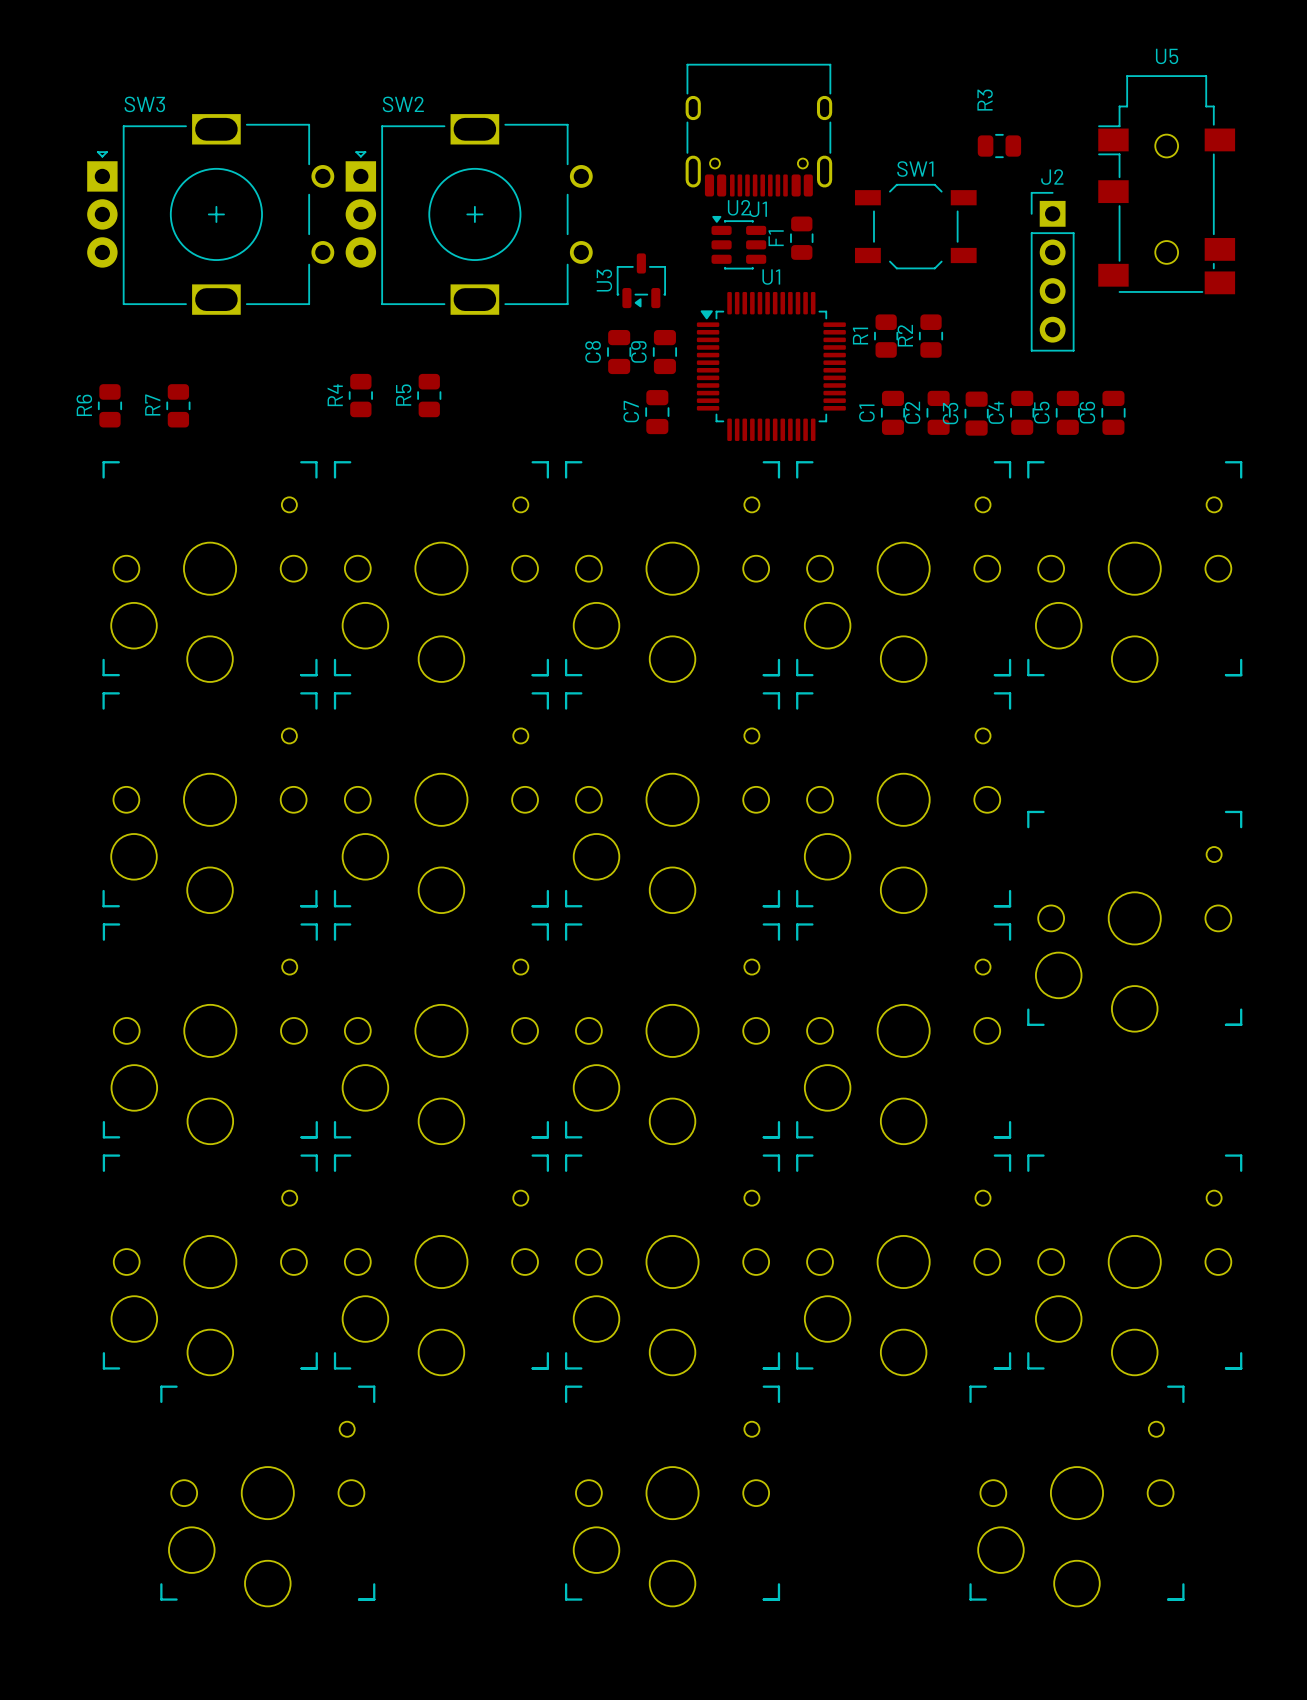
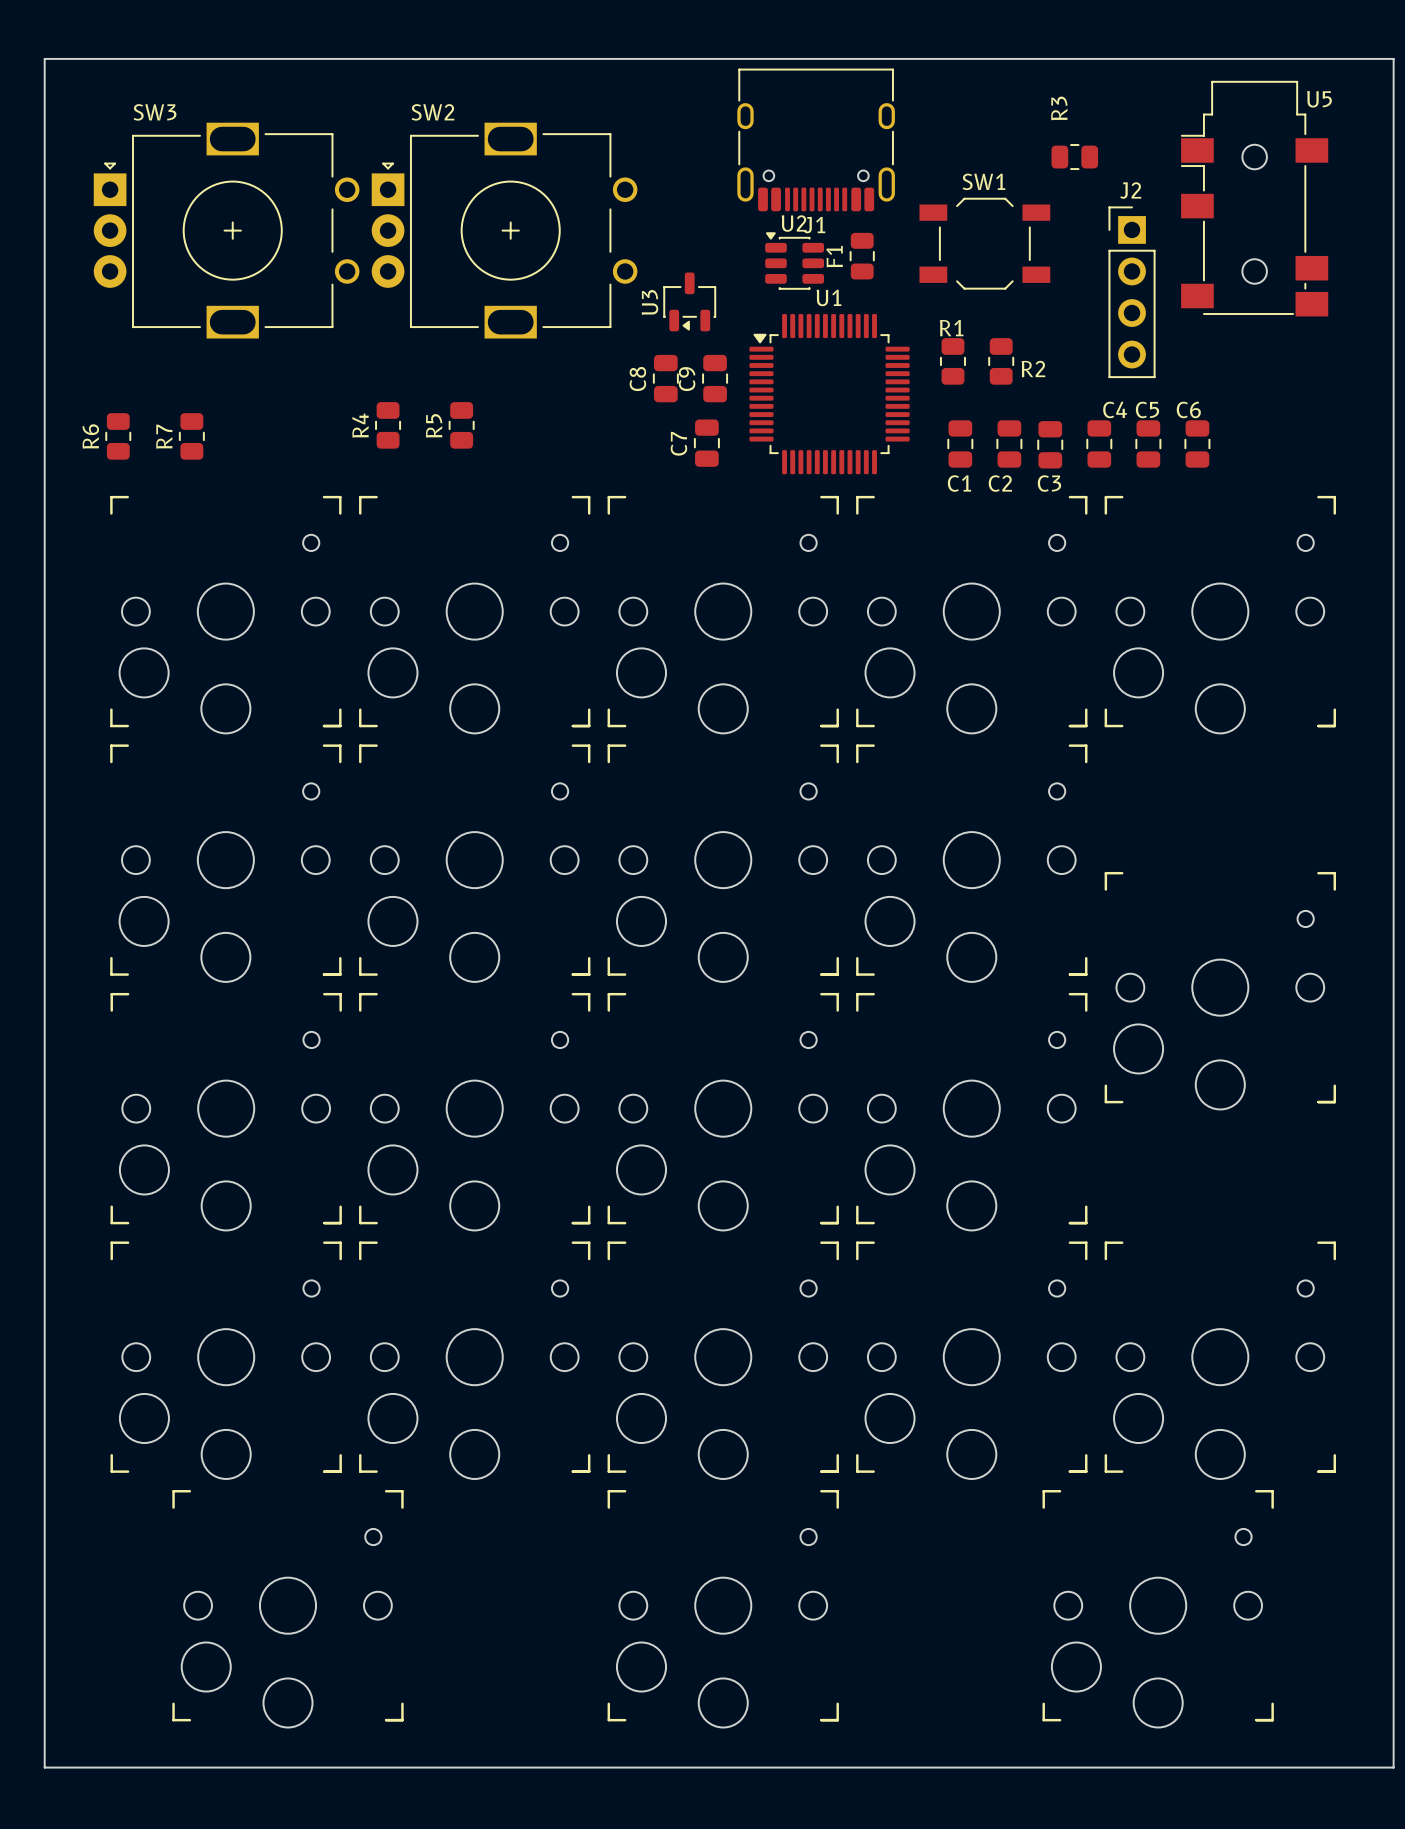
board edge: none -> (44, 58) (1393, 58) (1393, 1767) (44, 1767) (44, 58)
U5 name position: U5 (1167, 56) -> U5 (1319, 99)
R2 name rotation: 0° (905, 335) -> 90° clockwise (1033, 368)
R2 name position: R2 (905, 335) -> R2 (1033, 368)
R1 name rotation: 0° (860, 336) -> 90° clockwise (951, 328)
R1 name position: R1 (860, 336) -> R1 (951, 328)
C2 name rotation: 0° (912, 412) -> 90° clockwise (1000, 483)
C2 name position: C2 (912, 412) -> C2 (1000, 483)
C4 name rotation: 0° (996, 412) -> 90° clockwise (1115, 409)
C4 name position: C4 (996, 412) -> C4 (1115, 409)
C5 name rotation: 0° (1041, 412) -> 90° clockwise (1147, 409)
C5 name position: C5 (1041, 412) -> C5 (1147, 409)
C6 name rotation: 0° (1087, 412) -> 90° clockwise (1188, 409)
C1 name rotation: 0° (866, 413) -> 90° clockwise (959, 483)
C1 name position: C1 (866, 413) -> C1 (959, 483)
C3 name rotation: 0° (950, 413) -> 90° clockwise (1049, 483)
C3 name position: C3 (950, 413) -> C3 (1049, 483)

